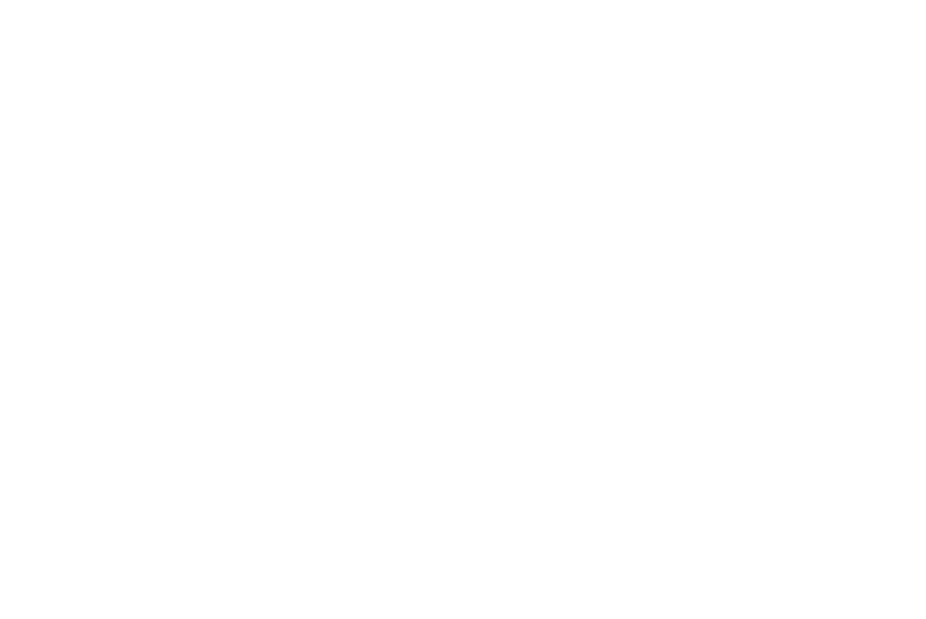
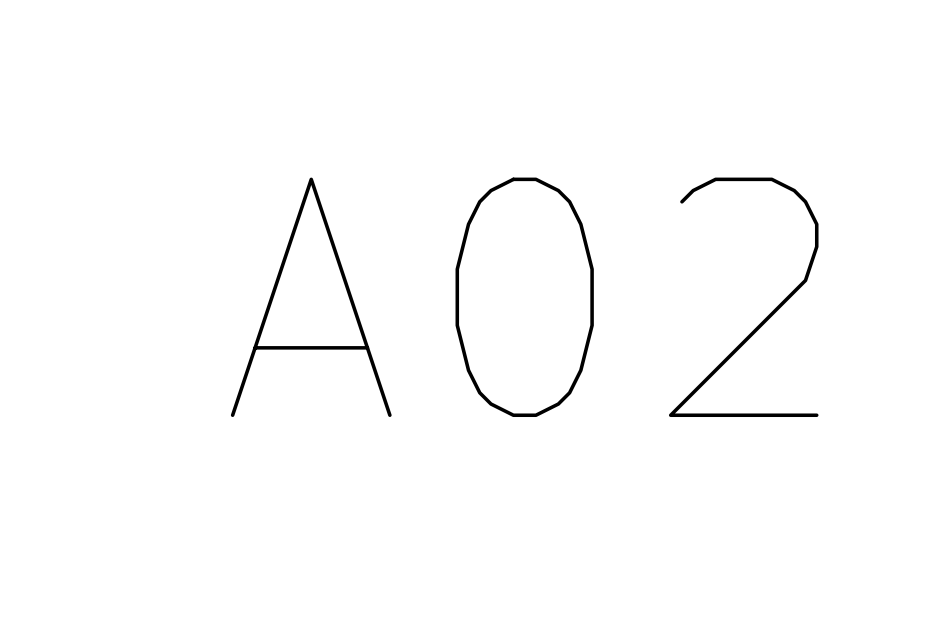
text: none -> A02 (524, 297)

